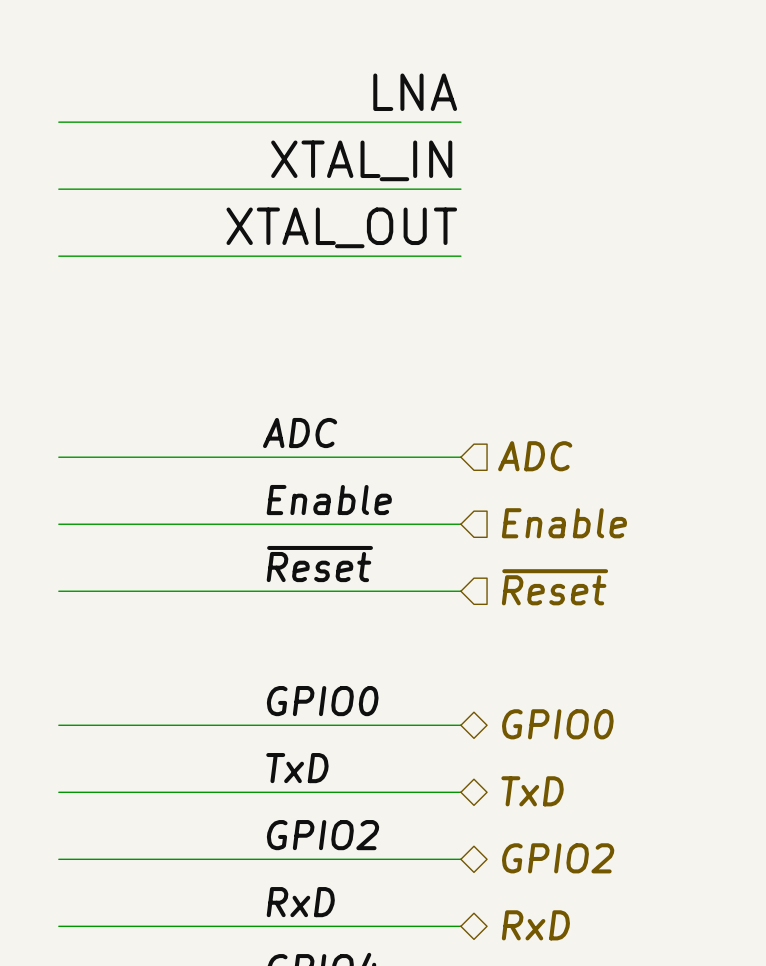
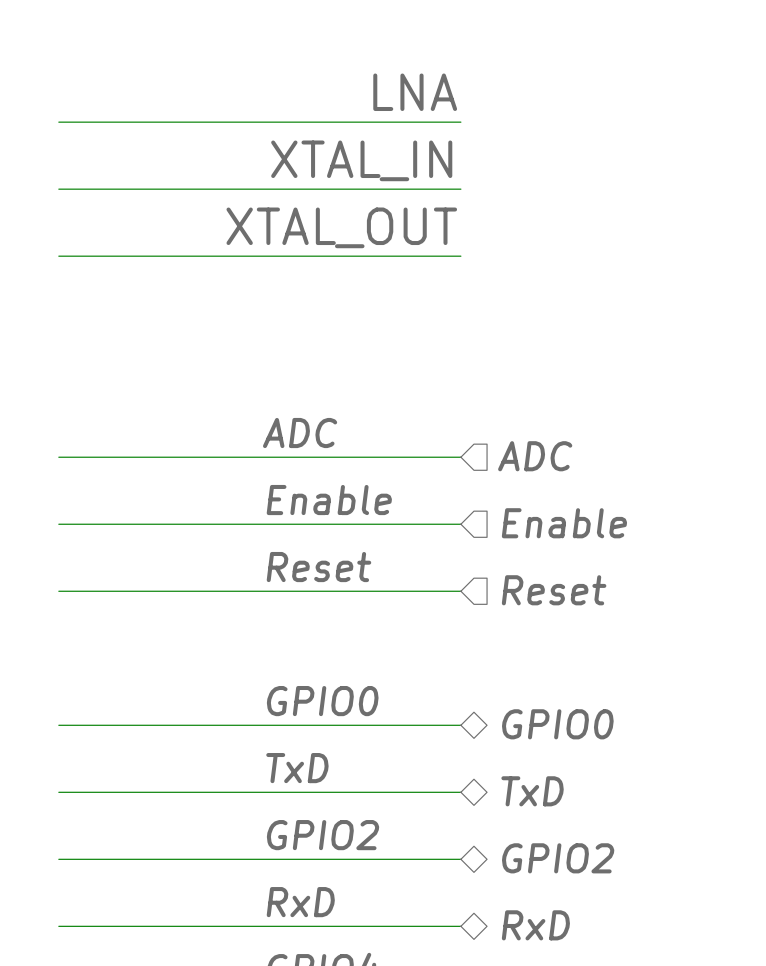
label: ~{Reset} (319, 564) -> Reset (318, 567)
hierarchical label: ~{Reset} (554, 587) -> Reset (554, 590)

